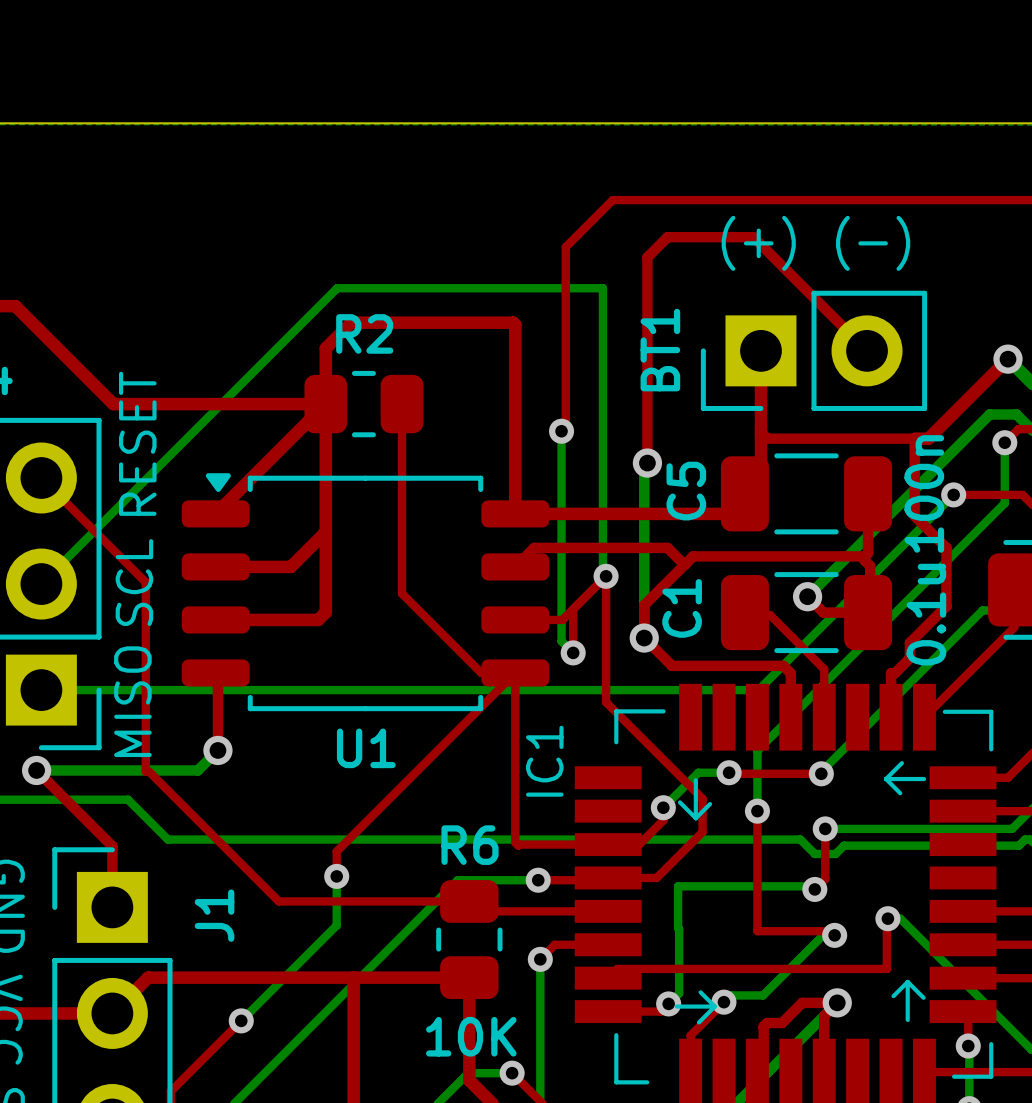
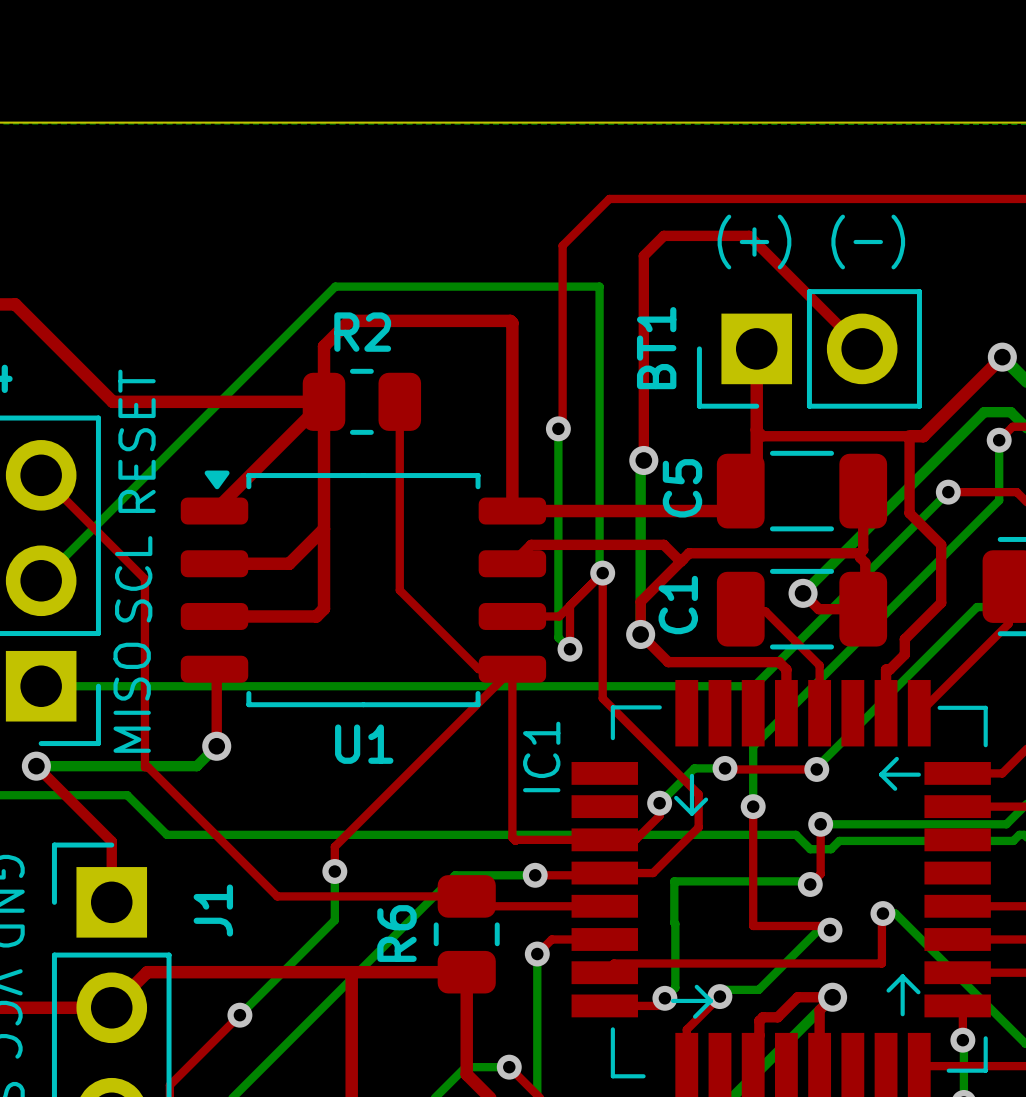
C5 value: 100n (924, 493) -> none
C1 value: 0.1u (926, 614) -> none
R6 name rotation: 0° (470, 845) -> 90° counterclockwise (396, 933)
R6 name position: R6 (470, 845) -> R6 (396, 933)
R6 value: 10K (471, 1036) -> none

